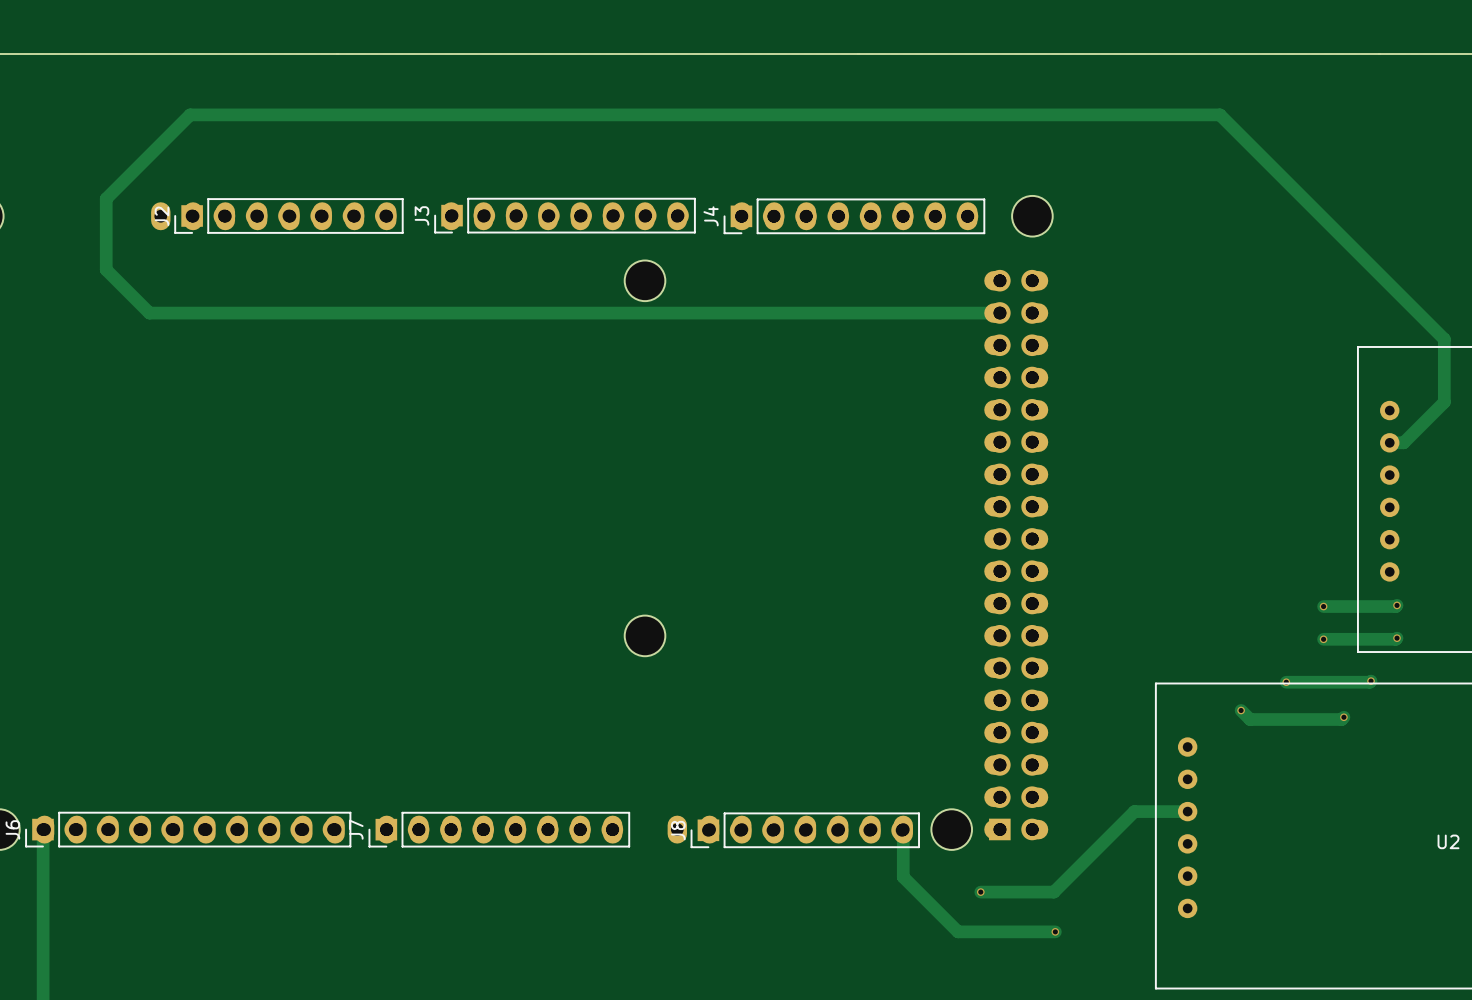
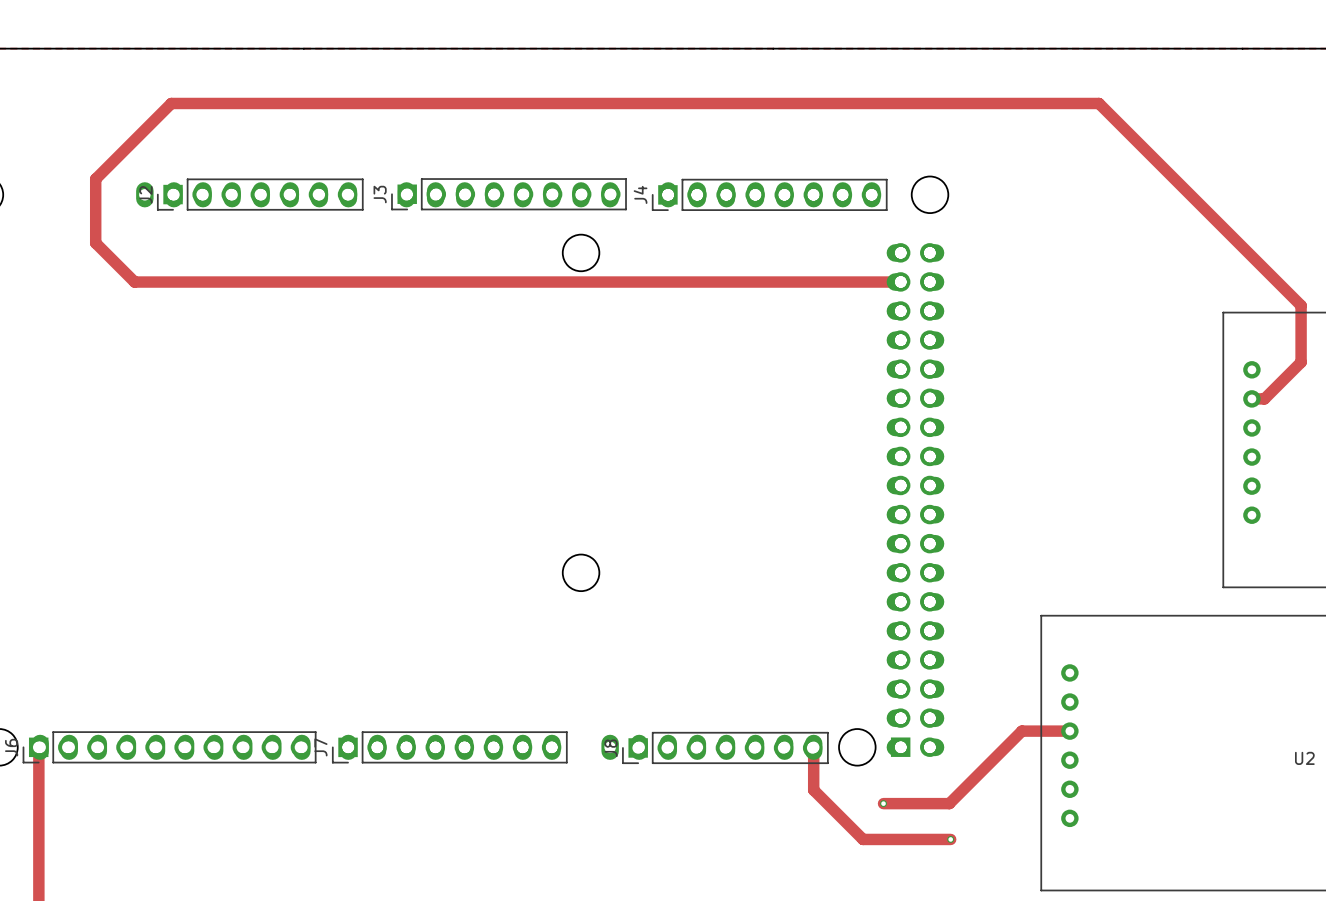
track: (1397, 605) (1323, 606) -> none
via: (1397, 605) -> none
via: (1323, 606) -> none
track: (1397, 638) (1323, 639) -> none
via: (1397, 638) -> none
via: (1323, 639) -> none
track: (1371, 681) (1286, 682) -> none
via: (1371, 681) -> none
via: (1286, 682) -> none
track: (1241, 710) (1250, 719) (1341, 719) (1343, 717) -> none
via: (1241, 710) -> none
via: (1343, 717) -> none

